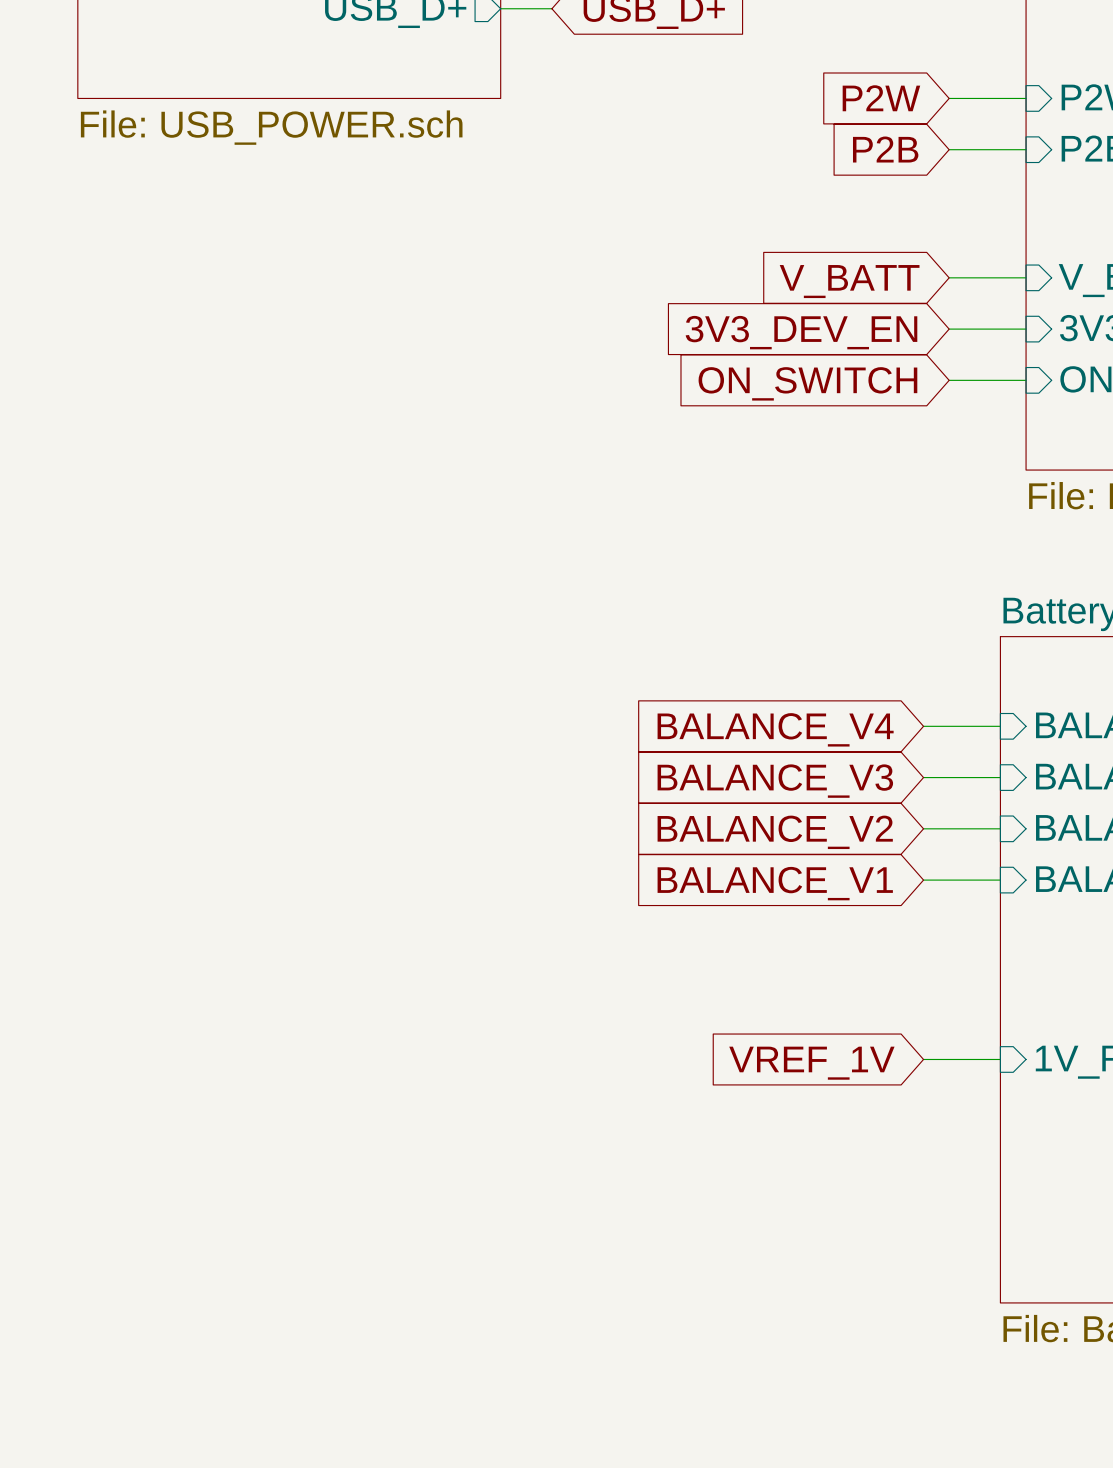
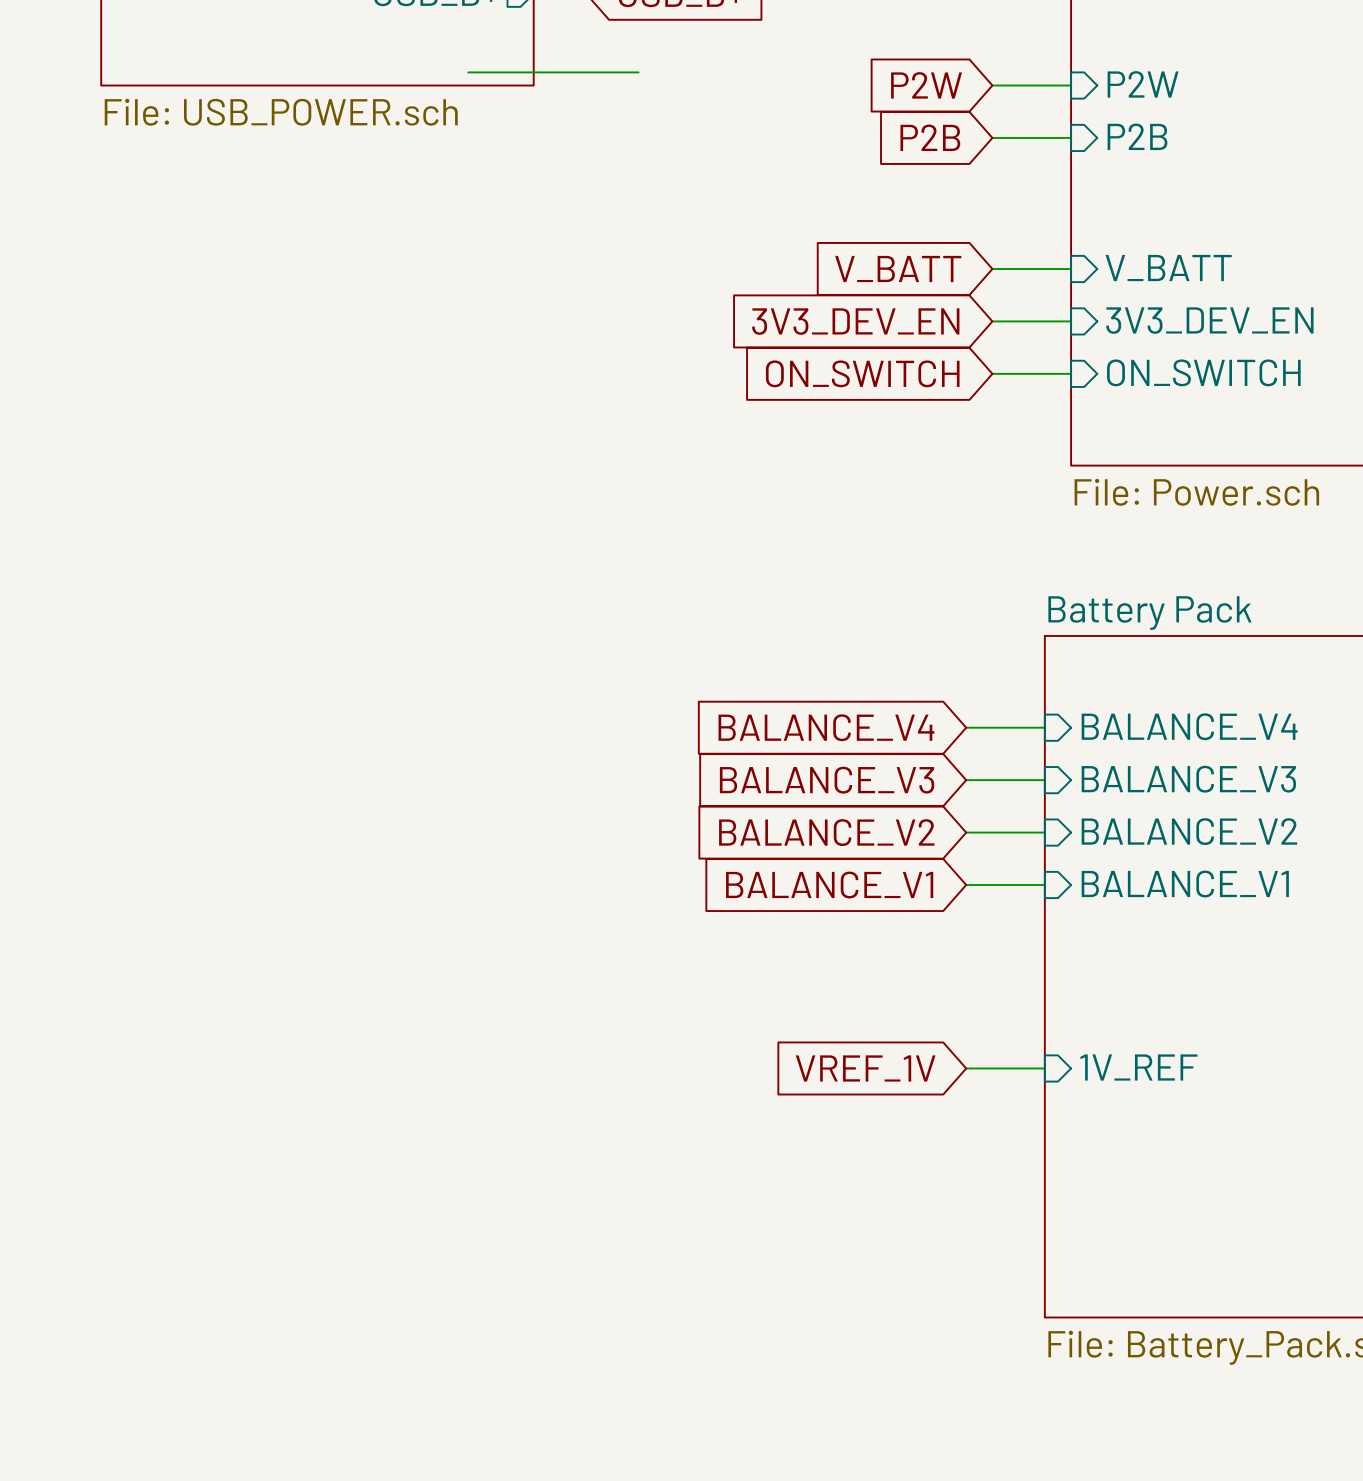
wire: none -> (468, 72) (638, 72)

